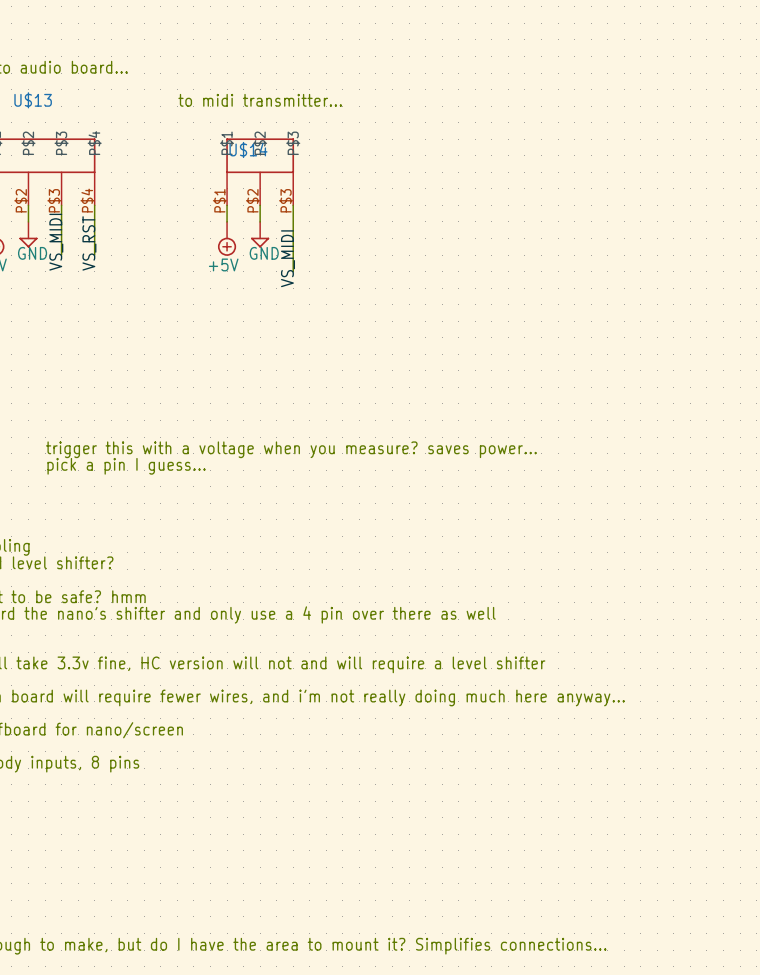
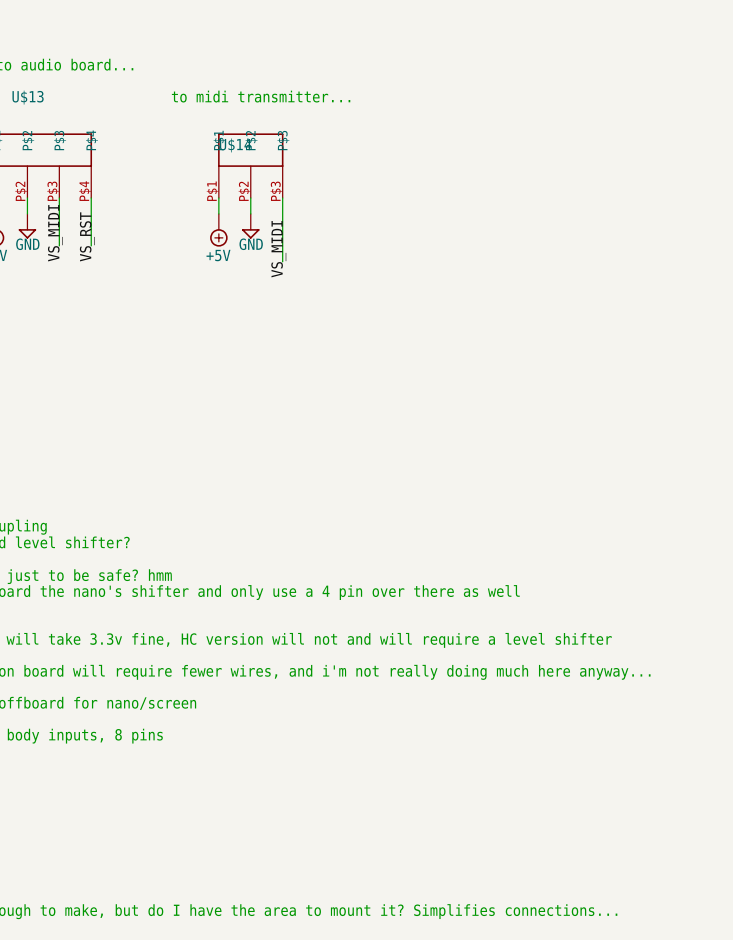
text: trigger this with a voltage when you measure? saves power... (291, 449) -> none
text: pick a pin I guess... (126, 466) -> none

